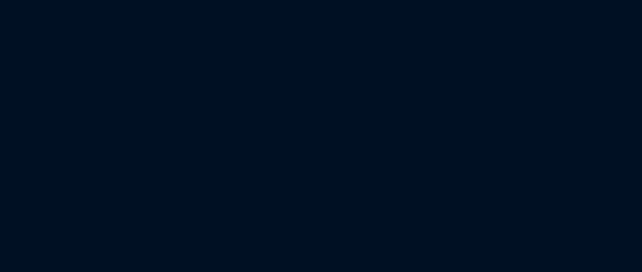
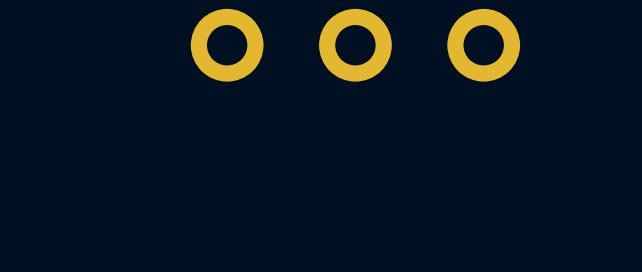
part: none -> (355, 45)

